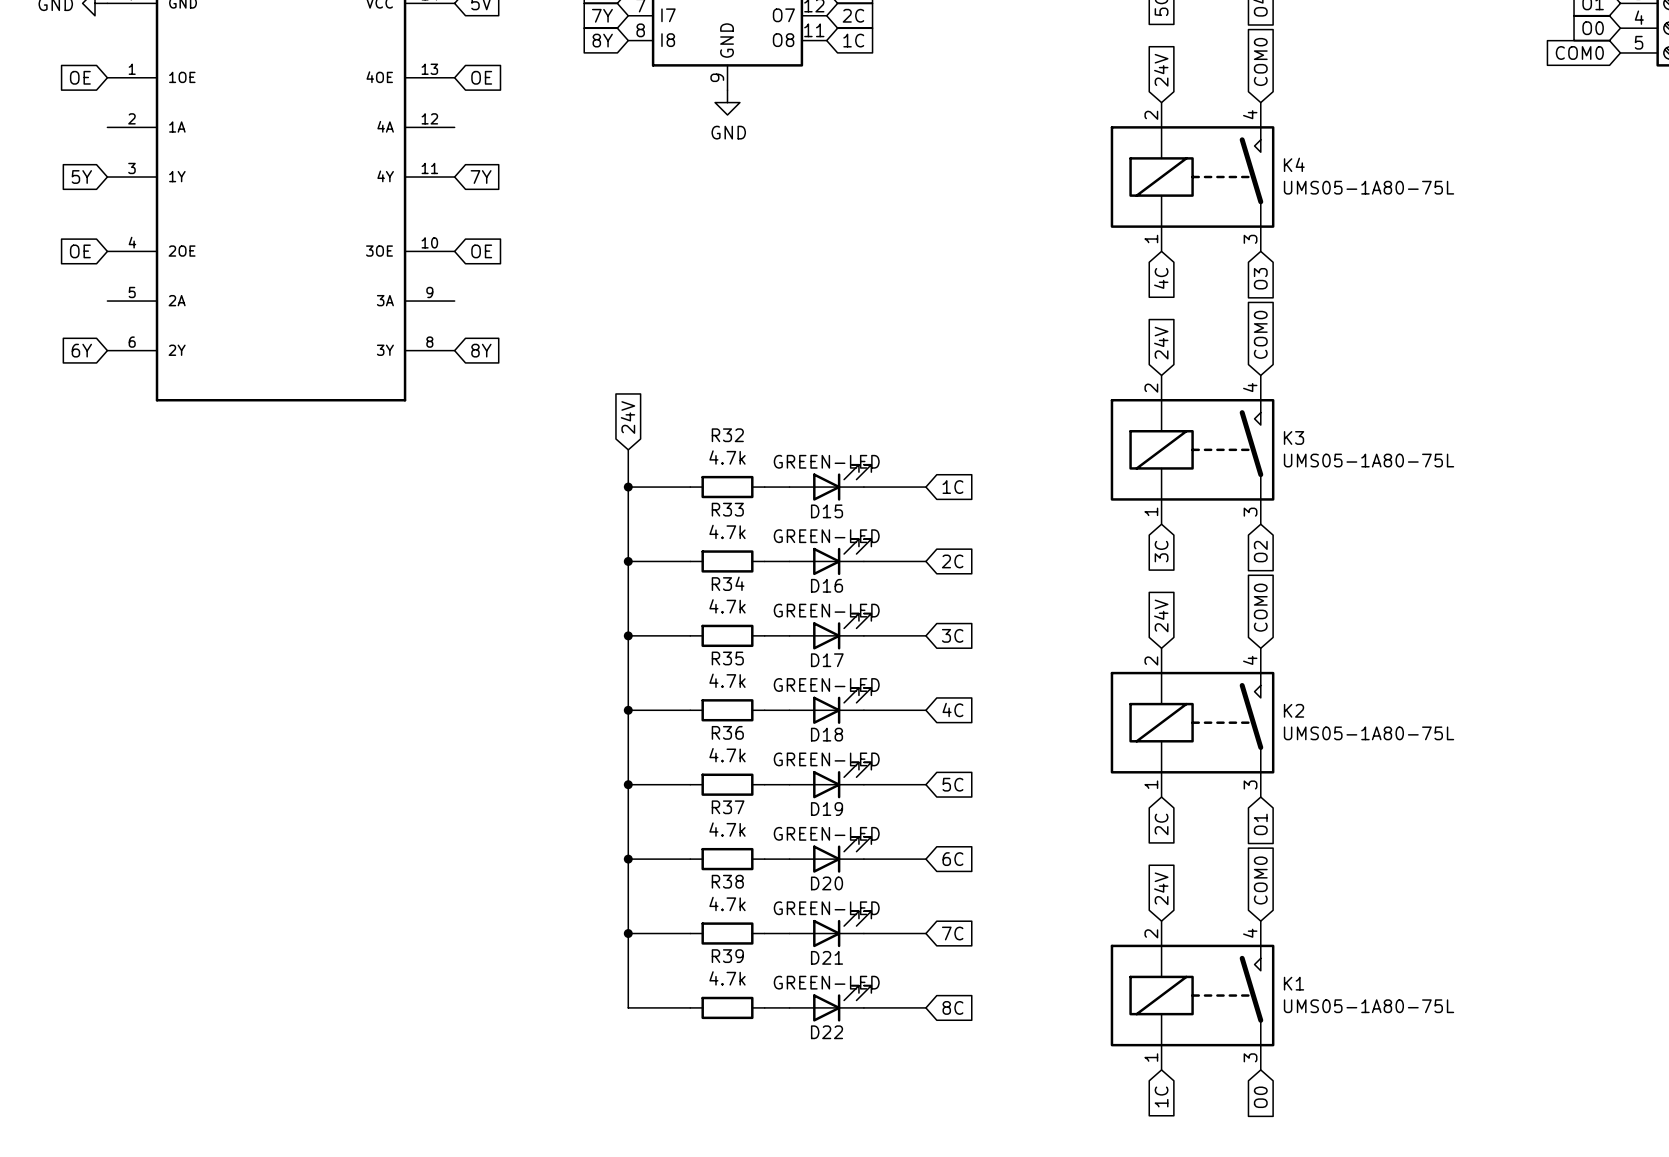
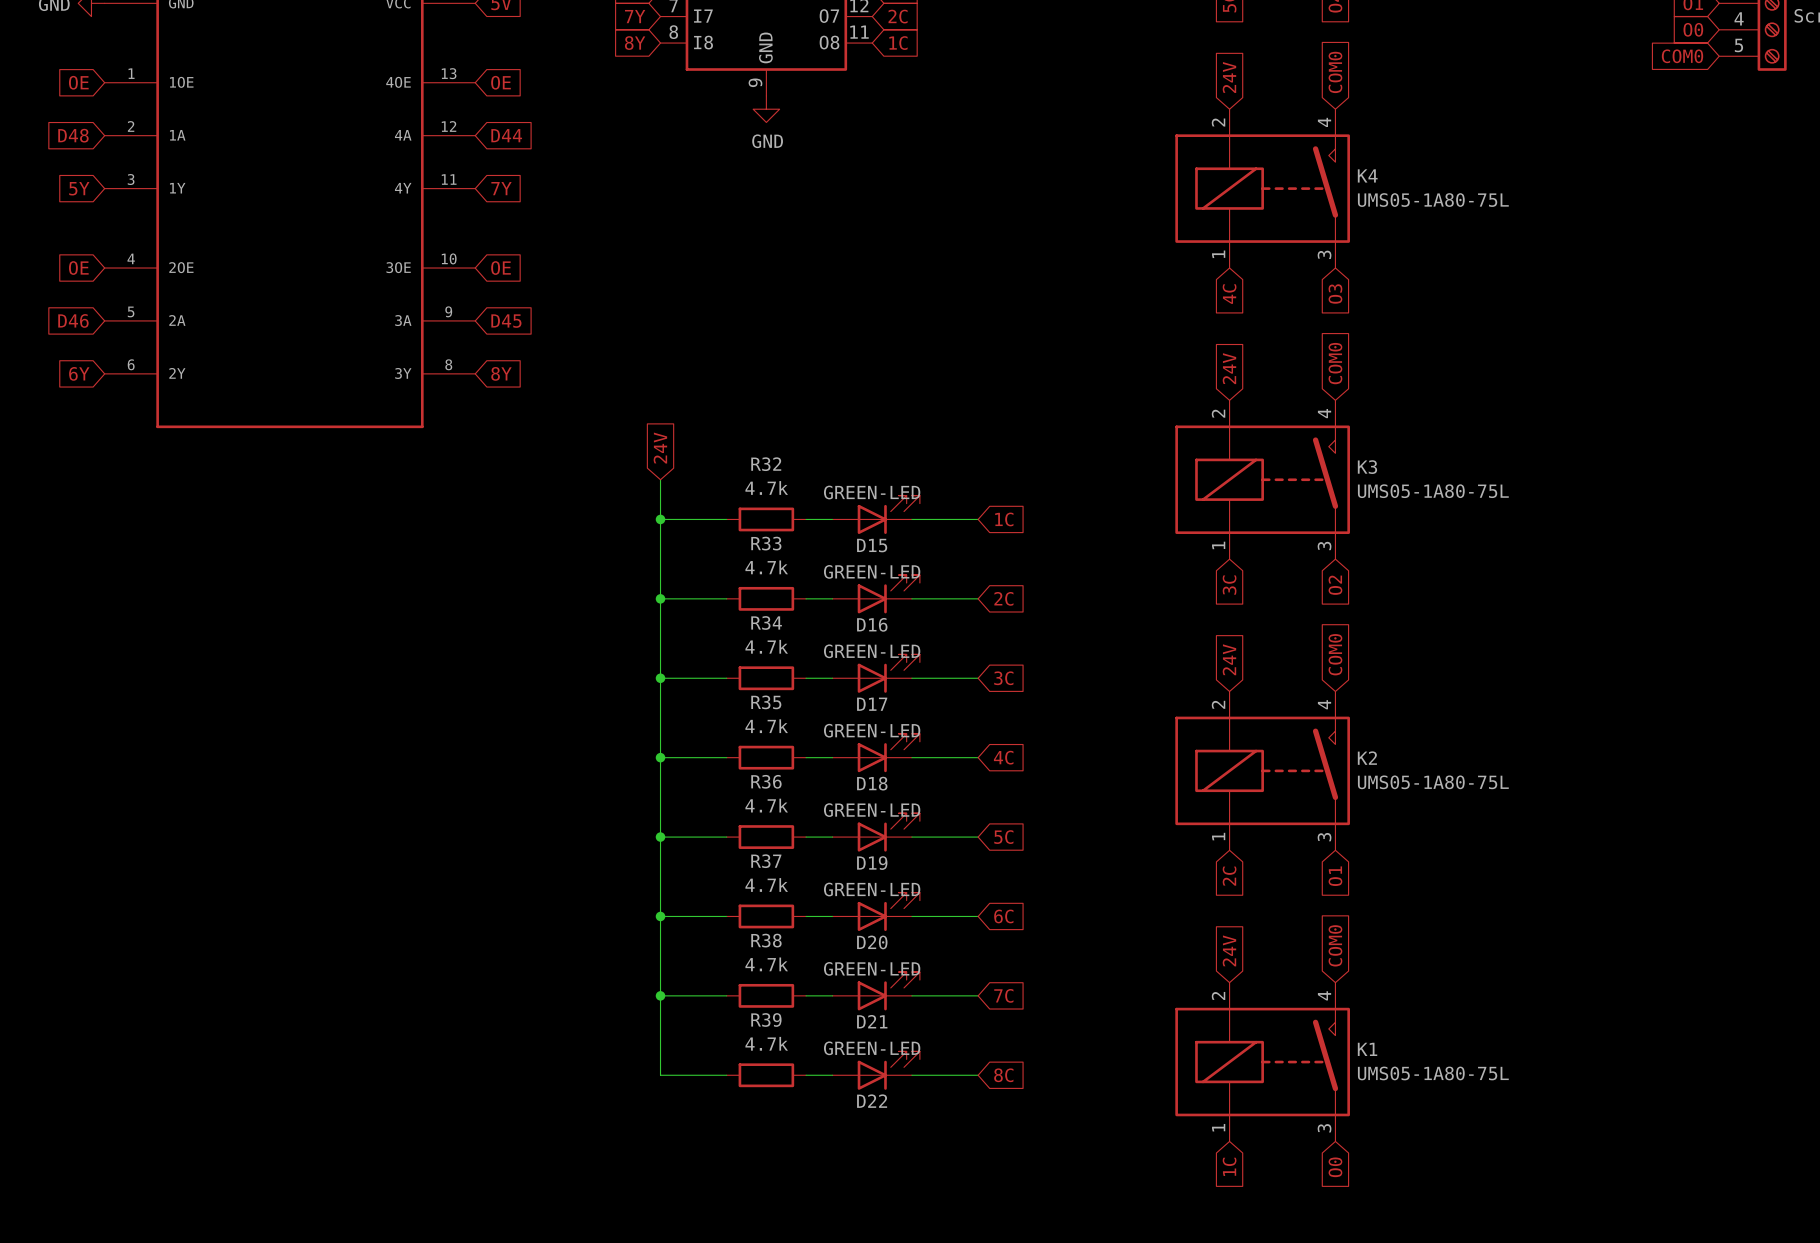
global label: none -> D48 (73, 135)
global label: none -> D44 (506, 135)
global label: none -> D46 (73, 320)
global label: none -> D45 (506, 321)

